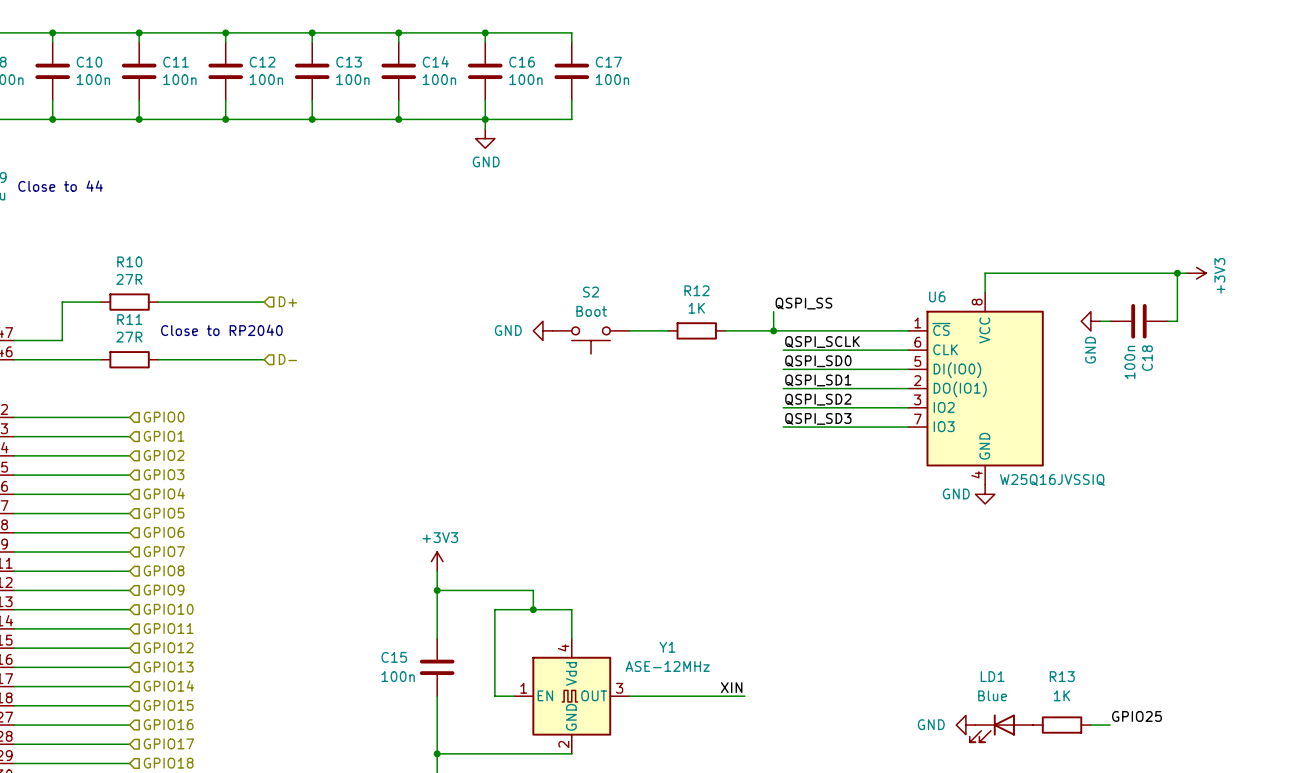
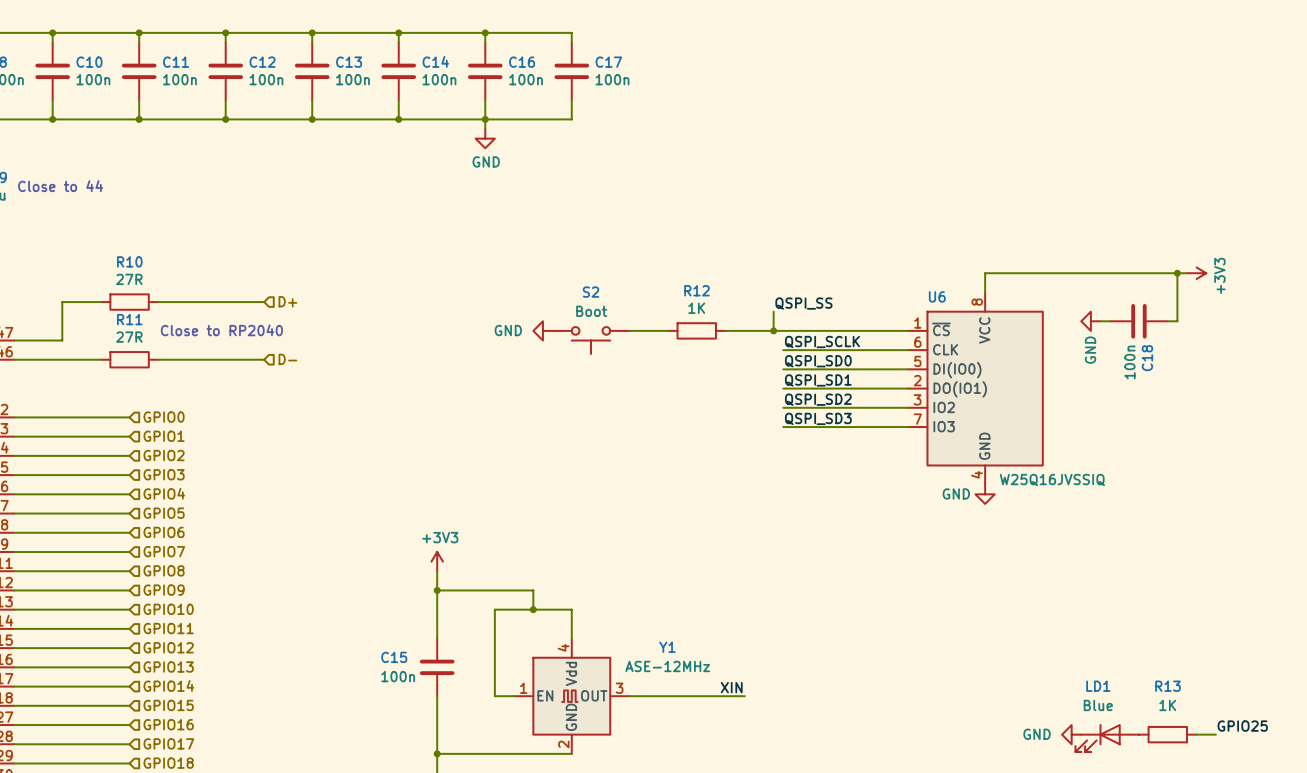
label position: GPIO25 (1136, 716) -> GPIO25 (1242, 726)
power symbol position: GND (965, 725) -> GND (1071, 734)
R13 position: (1062, 725) -> (1167, 734)
wire: (1090, 725) (1110, 725) -> (1196, 734) (1215, 734)
LD1 position: (1001, 728) -> (1107, 738)

